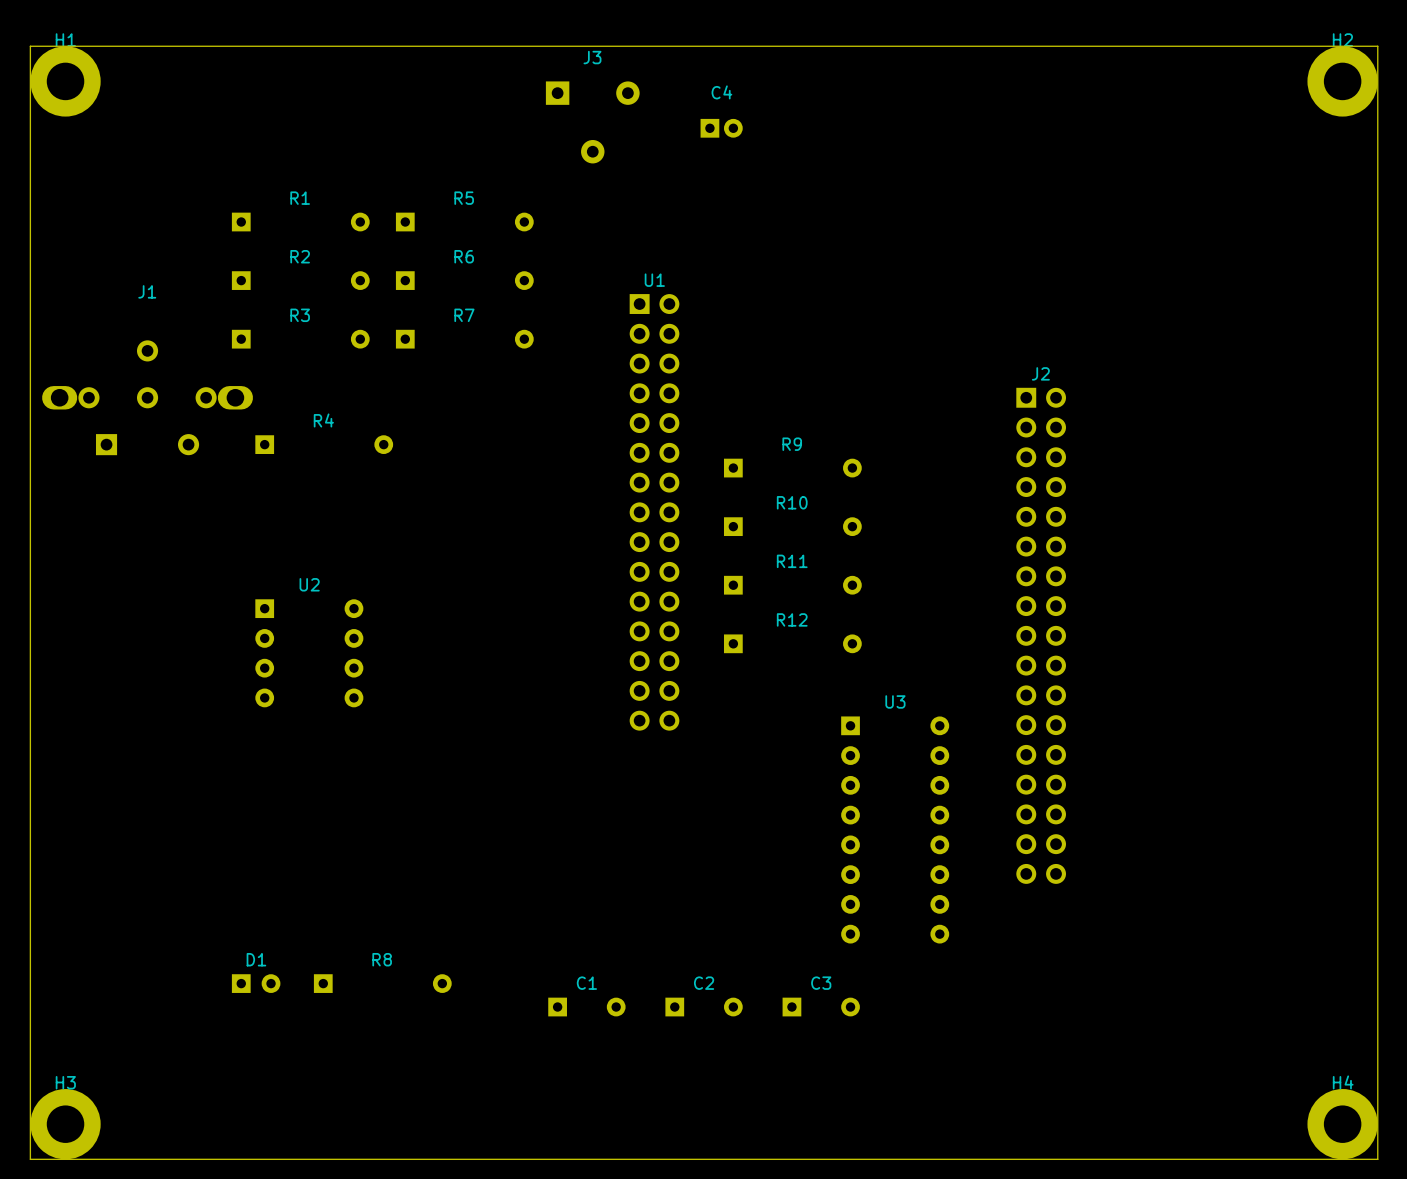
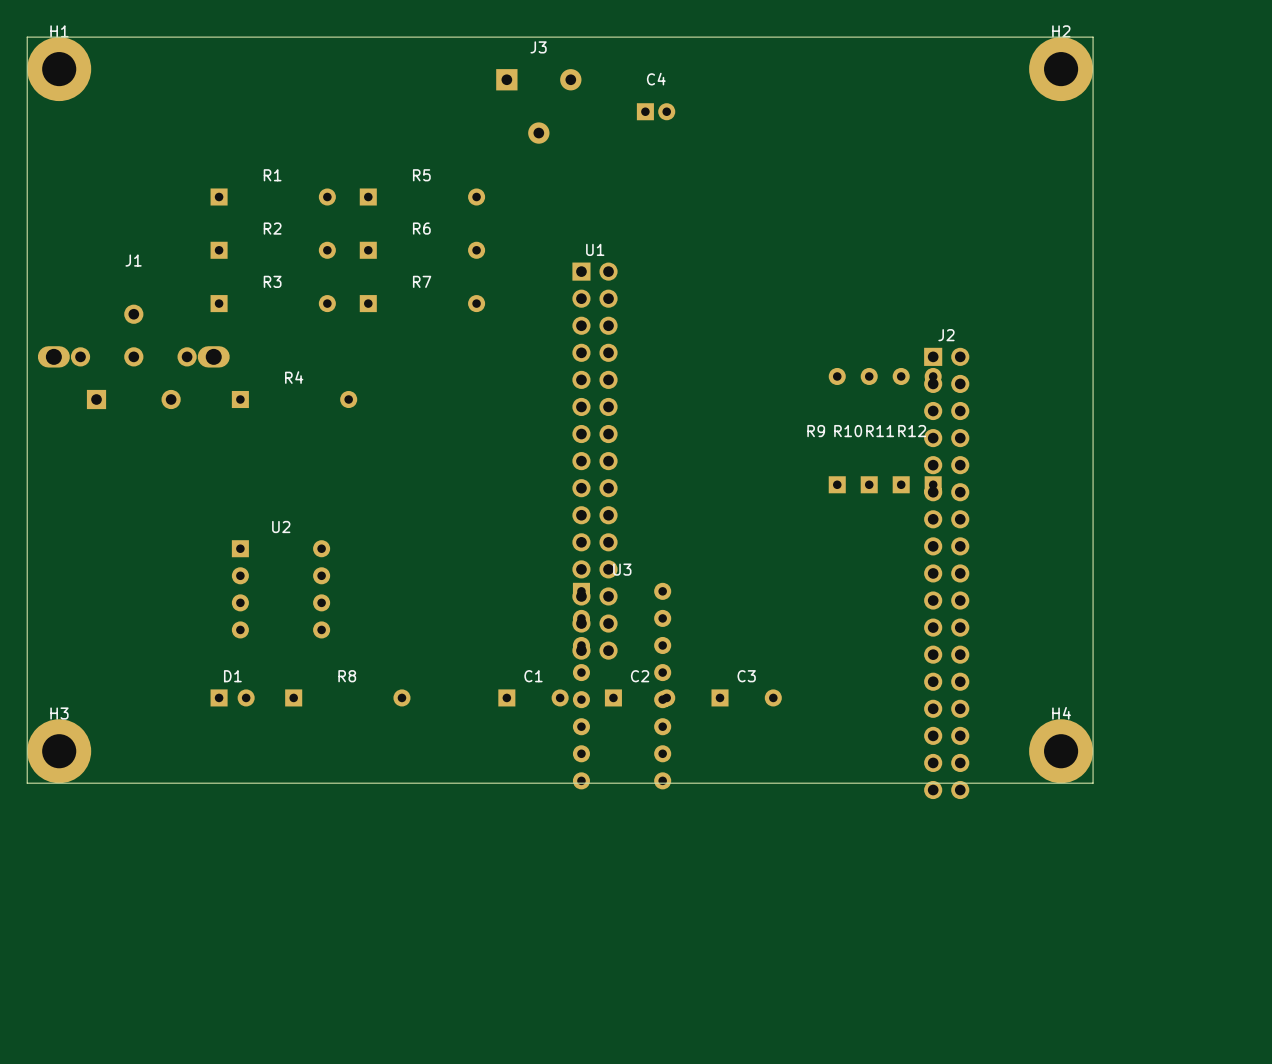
board edge: (1202, 46) (1377, 46) (1377, 1159) (30, 1159) (30, 866) -> (1093, 37) (1093, 783) (27, 783)
H2 position: (1342, 81) -> (1061, 69)
R9 rotation: 0° (792, 468) -> 90° counterclockwise (837, 430)
R9 position: (792, 468) -> (837, 430)
R10 rotation: 0° (792, 526) -> 90° counterclockwise (869, 430)
R10 position: (792, 526) -> (869, 430)
R11 rotation: 0° (792, 585) -> 90° counterclockwise (901, 430)
R11 position: (792, 585) -> (901, 430)
R12 rotation: 0° (792, 643) -> 90° counterclockwise (933, 430)
R12 position: (792, 643) -> (933, 430)
U3 position: (895, 829) -> (622, 686)
D1 position: (256, 983) -> (232, 697)
R8 position: (382, 983) -> (347, 697)
C1 position: (586, 1007) -> (533, 697)
C2 position: (704, 1007) -> (640, 697)
C3 position: (821, 1007) -> (746, 697)
H3 position: (65, 1124) -> (59, 751)
H4 position: (1342, 1124) -> (1061, 751)

